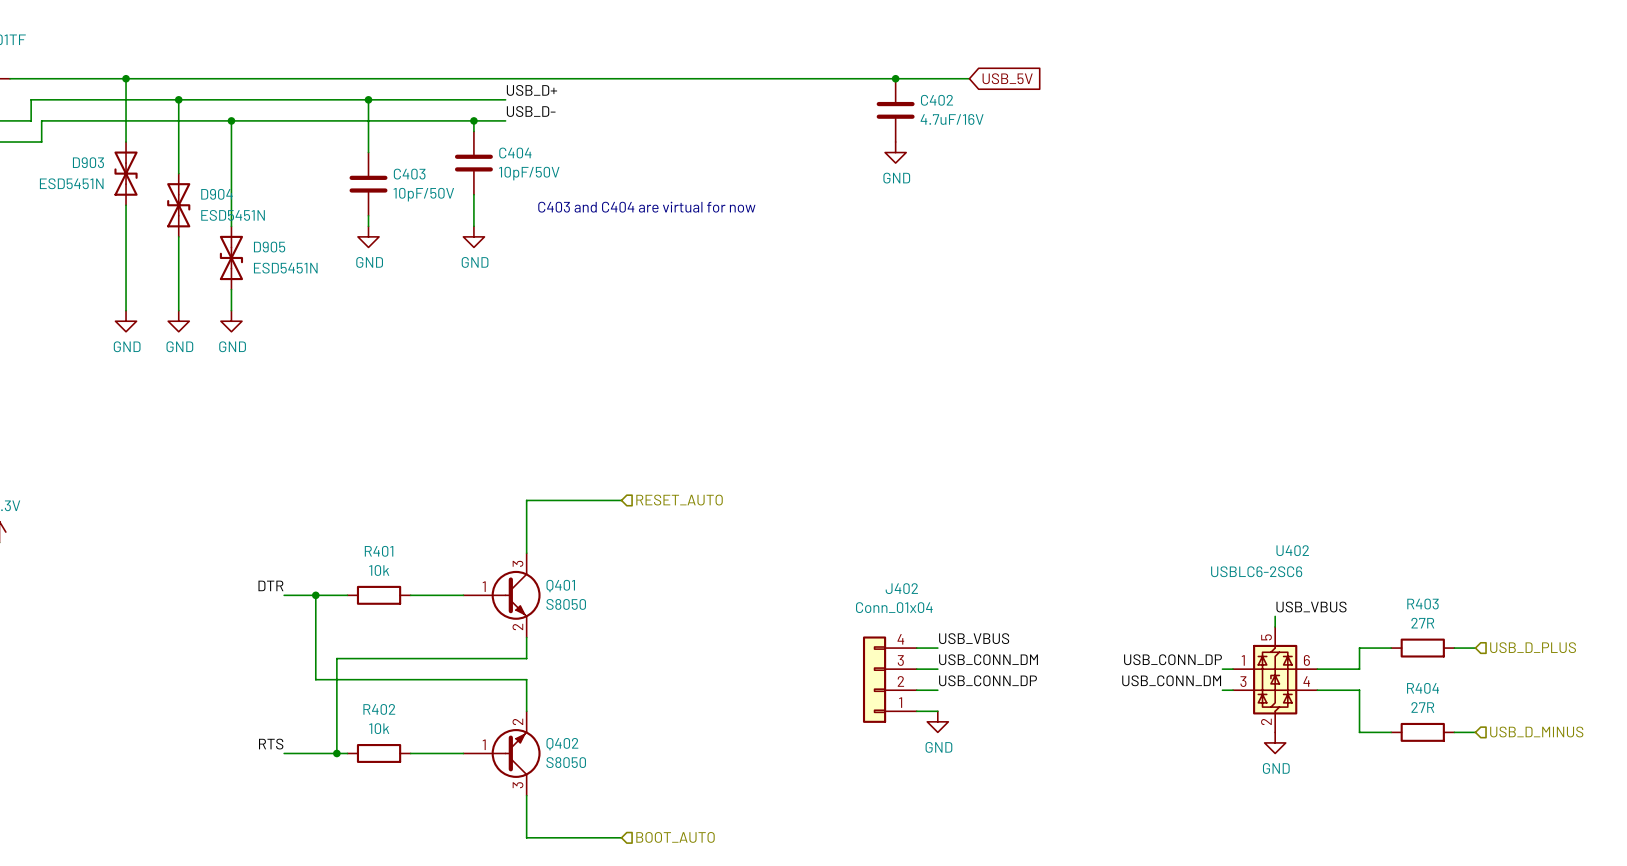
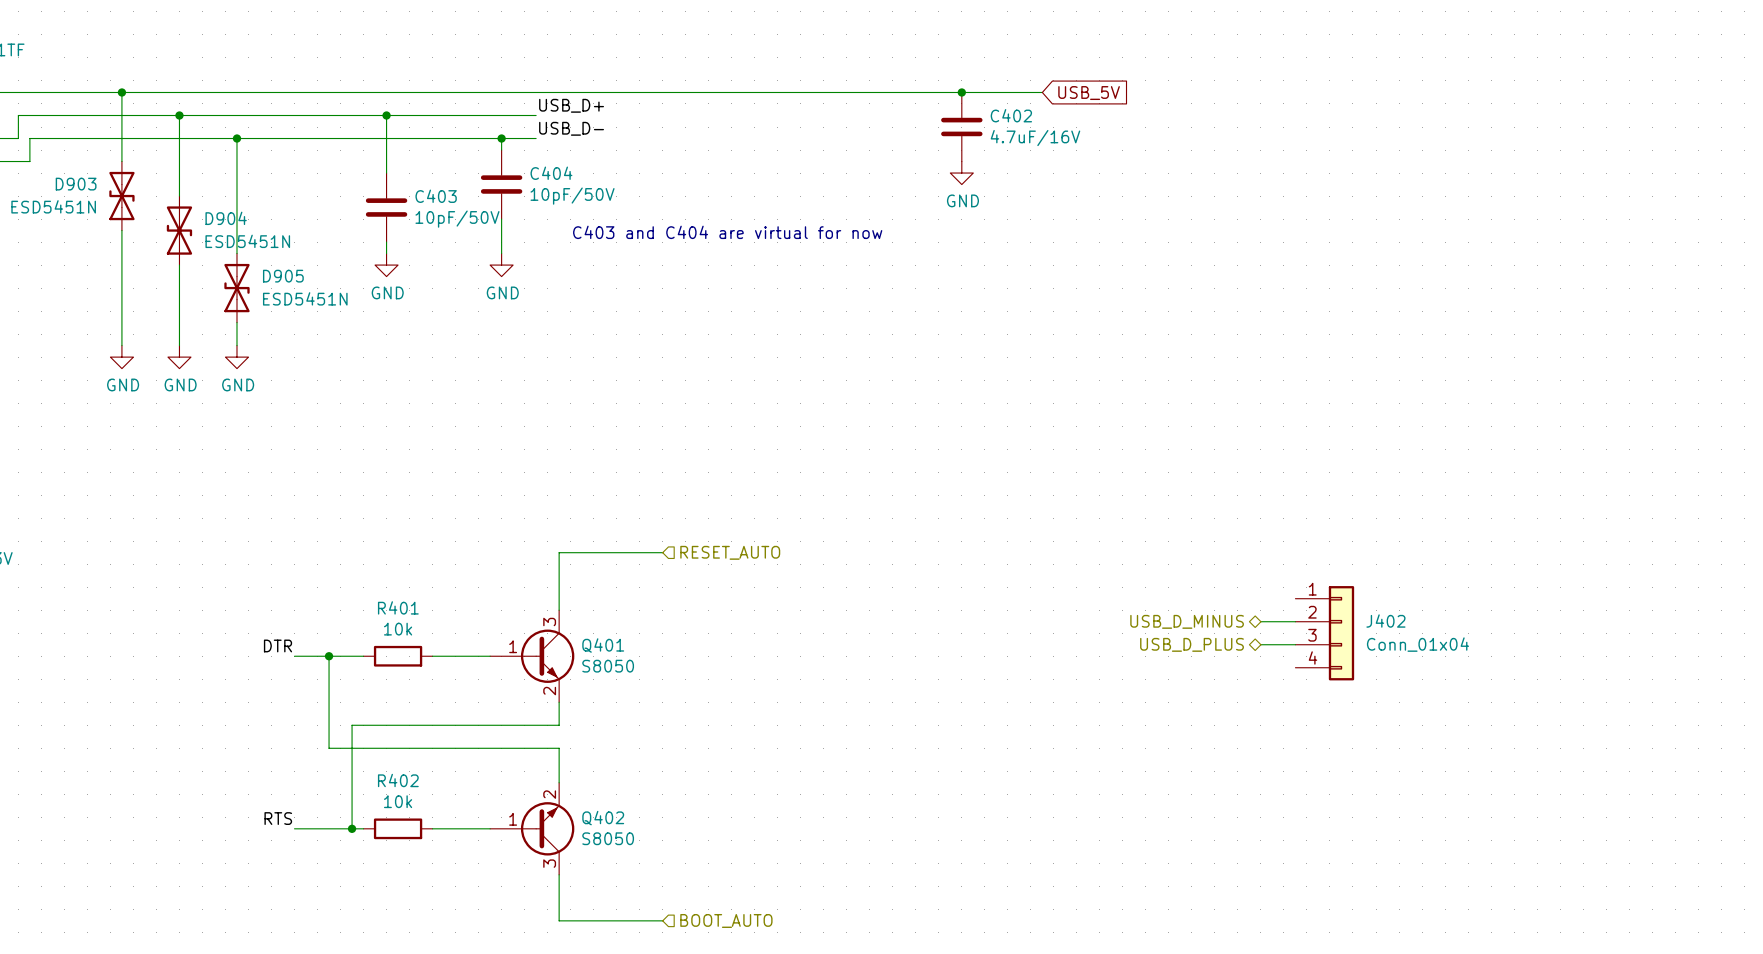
hierarchical label: none -> USB_D_MINUS (1187, 621)
wire: none -> (1260, 621) (1295, 621)
hierarchical label: none -> USB_D_PLUS (1192, 644)
wire: none -> (1260, 644) (1295, 644)
J402 name position: J402 (901, 588) -> J402 (1385, 621)
J402 value position: Conn_01x04 (894, 607) -> Conn_01x04 (1418, 644)
label: USB_VBUS (1311, 607) -> none
wire: (1275, 616) (1275, 626) -> none
label: USB_VBUS (974, 638) -> none
hierarchical label: USB_D_PLUS (1533, 647) -> none
wire: (916, 648) (937, 648) -> none
wire: (1391, 648) (1359, 648) (1359, 669) (1317, 669) -> none
R403: 27R (1422, 648) -> none
wire: (1454, 648) (1475, 648) -> none
label: USB_CONN_DM (988, 659) -> none
label: USB_CONN_DP (1172, 659) -> none
wire: (916, 669) (937, 669) -> none
wire: (1222, 669) (1233, 669) -> none
J402 rotation: 0° (874, 679) -> 180° (1341, 633)
J402 position: (889, 679) -> (1324, 633)
U402: USBLC6-2SC6 (1275, 679) -> none
label: USB_CONN_DP (988, 680) -> none
label: USB_CONN_DM (1171, 680) -> none
wire: (916, 690) (937, 690) -> none
wire: (1222, 690) (1233, 690) -> none
wire: (1317, 690) (1359, 690) (1359, 732) (1391, 732) -> none
wire: (916, 711) (937, 711) -> none
power symbol: GND (937, 721) -> none
R404: 27R (1422, 732) -> none
wire: (1454, 732) (1475, 732) -> none
hierarchical label: USB_D_MINUS (1536, 732) -> none
power symbol: GND (1275, 742) -> none

